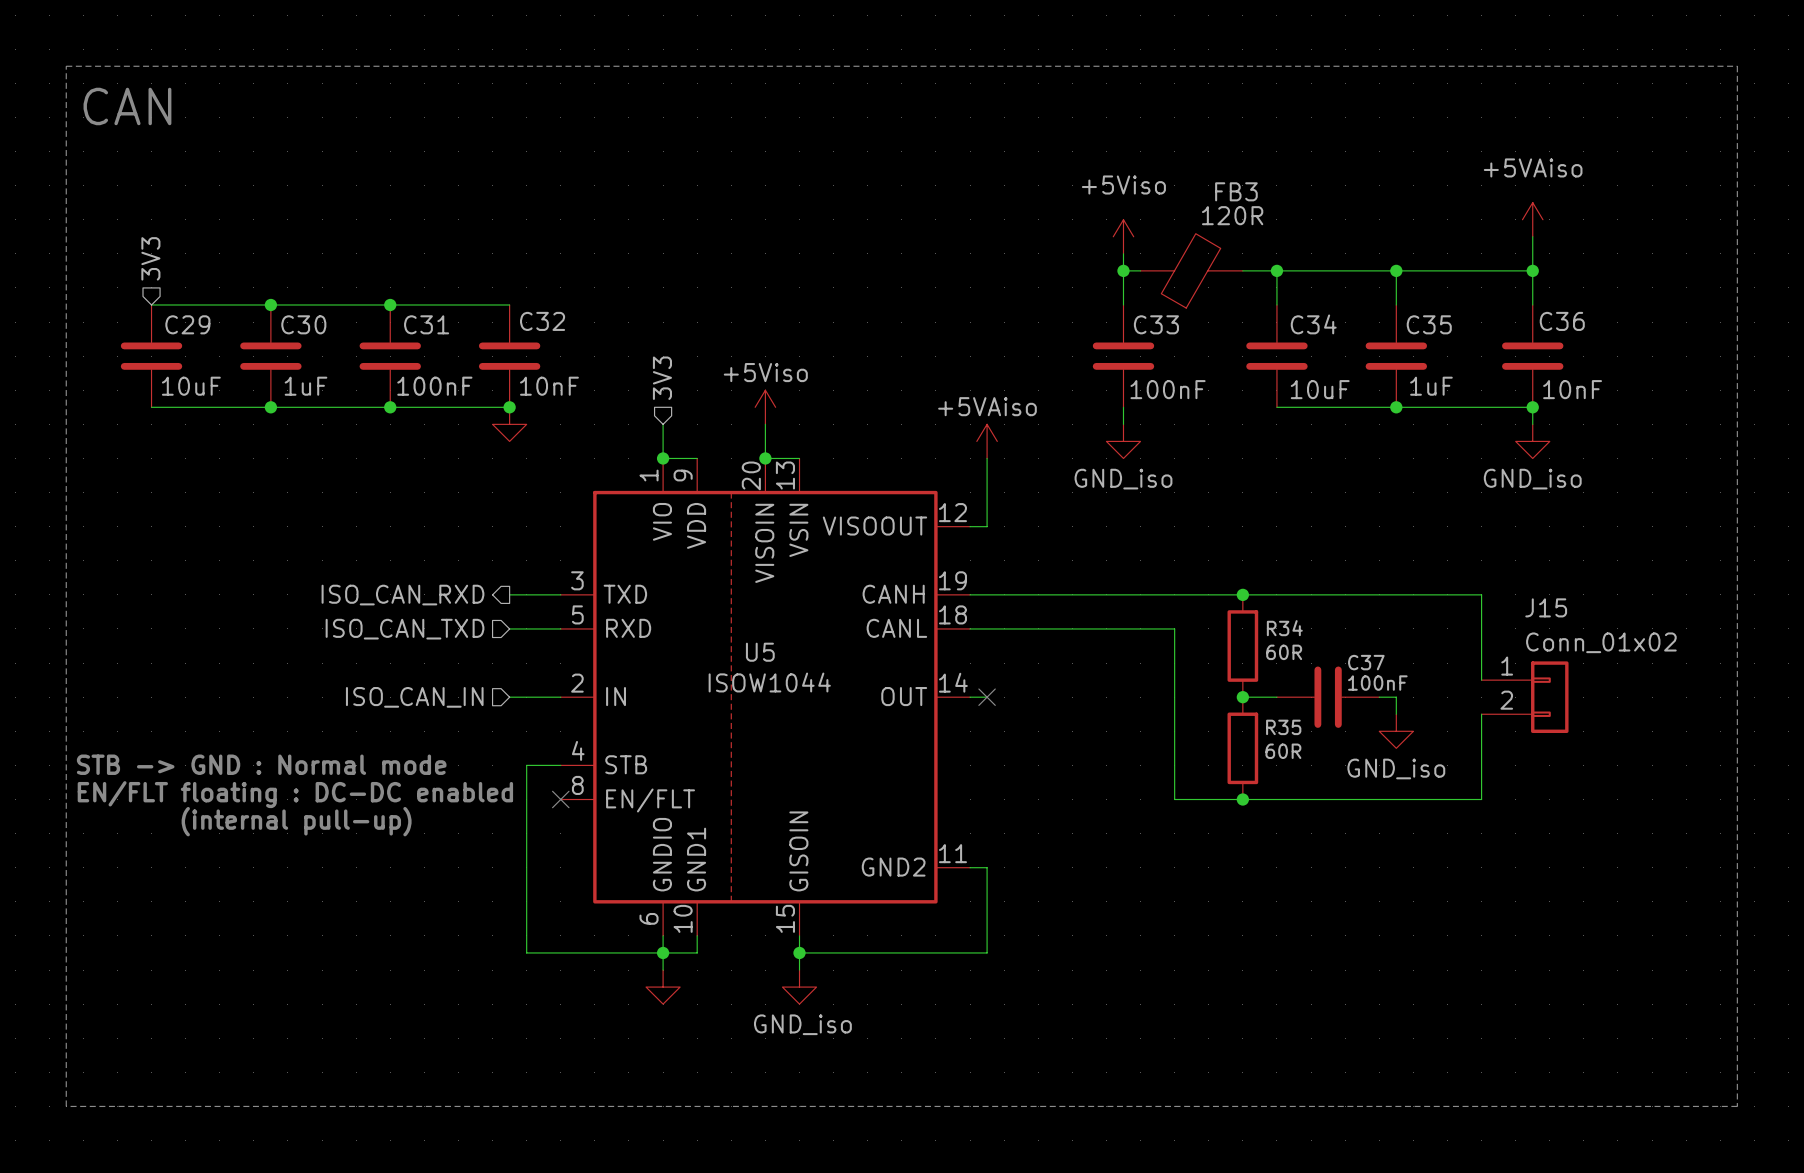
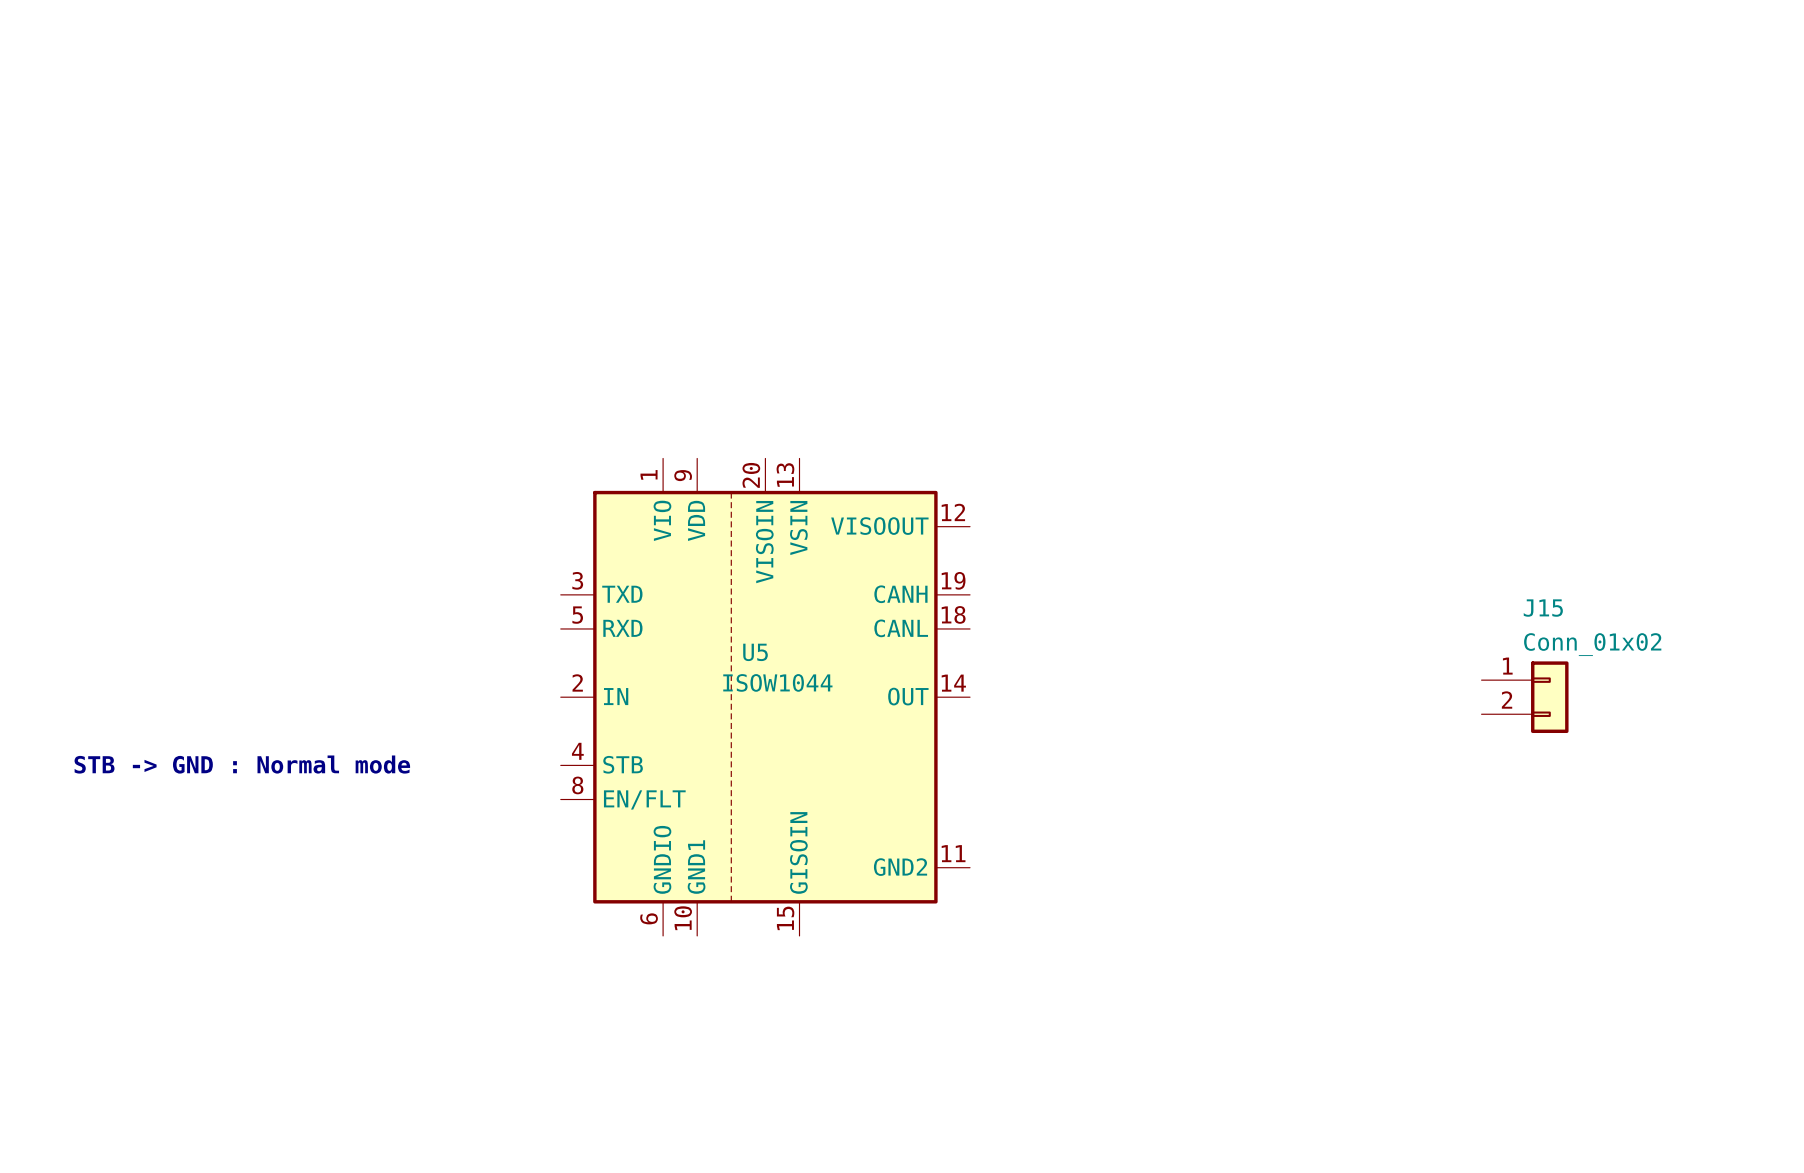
line: (66, 66) (1737, 66) (1737, 1106) (66, 1106) (66, 66) -> none
text: CAN (127, 106) -> none
power symbol: +5VAiso (1532, 219) -> none
power symbol: +5Viso (1123, 236) -> none
wire: (1532, 236) (1532, 304) -> none
wire: (1123, 253) (1123, 304) -> none
hierarchical label: 3V3 (150, 258) -> none
wire: (1123, 270) (1140, 270) -> none
junction: (1123, 270) -> none
FB3: 120R (1191, 270) -> none
wire: (1242, 270) (1532, 270) -> none
wire: (1276, 270) (1276, 304) -> none
junction: (1276, 270) -> none
wire: (1396, 270) (1396, 304) -> none
junction: (1396, 270) -> none
junction: (1532, 270) -> none
wire: (151, 304) (509, 304) -> none
junction: (270, 304) -> none
junction: (390, 304) -> none
C29: 10uF (151, 356) -> none
C30: 1uF (270, 356) -> none
C31: 100nF (390, 356) -> none
C32: 10nF (509, 356) -> none
C33: 100nF (1123, 356) -> none
C34: 10uF (1276, 356) -> none
C35: 1uF (1396, 356) -> none
C36: 10nF (1532, 356) -> none
hierarchical label: 3V3 (662, 378) -> none
wire: (151, 407) (509, 407) -> none
junction: (270, 407) -> none
junction: (390, 407) -> none
junction: (509, 407) -> none
power symbol: +5Viso (765, 407) -> none
wire: (1123, 407) (1123, 424) -> none
wire: (1276, 407) (1532, 407) (1532, 424) -> none
junction: (1396, 407) -> none
junction: (1532, 407) -> none
power symbol: (509, 424) -> none
wire: (663, 424) (663, 458) (697, 458) -> none
wire: (765, 424) (765, 458) (799, 458) -> none
power symbol: +5VAiso (987, 441) -> none
power symbol: GND_iso (1123, 441) -> none
power symbol: GND_iso (1532, 441) -> none
junction: (663, 458) -> none
junction: (765, 458) -> none
wire: (987, 458) (987, 526) (970, 526) -> none
wire: (509, 594) (560, 594) -> none
wire: (970, 594) (1481, 594) (1481, 680) -> none
junction: (1242, 594) -> none
hierarchical label: ISO_CAN_RXD (402, 595) -> none
wire: (509, 628) (560, 628) -> none
wire: (970, 628) (1174, 628) (1174, 799) (1481, 799) (1481, 714) -> none
hierarchical label: ISO_CAN_TXD (405, 629) -> none
R34: 60R (1242, 646) -> none
hierarchical label: ISO_CAN_IN (414, 697) -> none
wire: (509, 697) (560, 697) -> none
wire: (970, 697) (987, 697) -> none
no-connect mark: (987, 697) -> none
wire: (1242, 697) (1276, 697) -> none
junction: (1242, 697) -> none
C37: 100nF (1328, 697) -> none
wire: (1379, 697) (1396, 697) (1396, 714) -> none
power symbol: GND_iso (1396, 731) -> none
R35: 60R (1242, 748) -> none
wire: (560, 765) (526, 765) (526, 952) (697, 952) (697, 935) -> none
text: EN/FLT floating : DC-DC enabled (295, 794) -> none
no-connect mark: (560, 799) -> none
junction: (1242, 799) -> none
text: (internal pull-up) (296, 821) -> none
wire: (970, 867) (987, 867) (987, 952) (799, 952) -> none
wire: (663, 935) (663, 970) -> none
wire: (799, 935) (799, 970) -> none
junction: (663, 952) -> none
junction: (799, 952) -> none
power symbol: (663, 987) -> none
power symbol: GND_iso (799, 987) -> none

